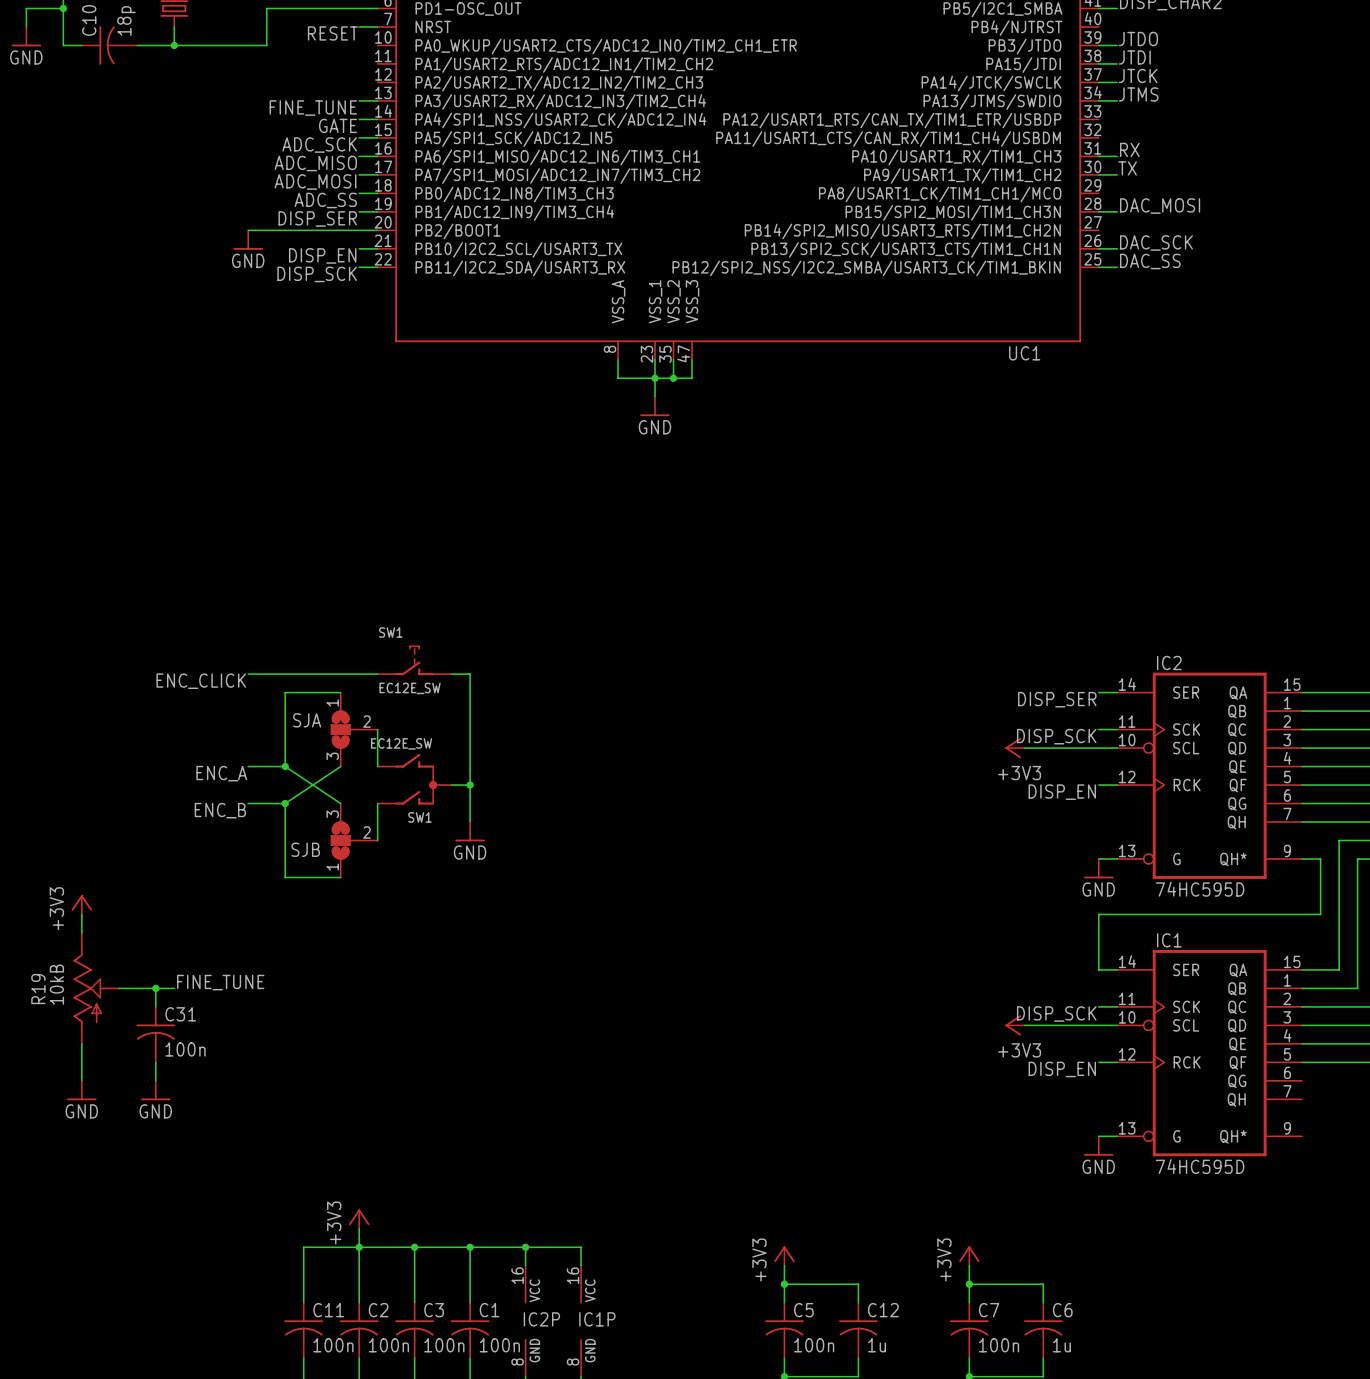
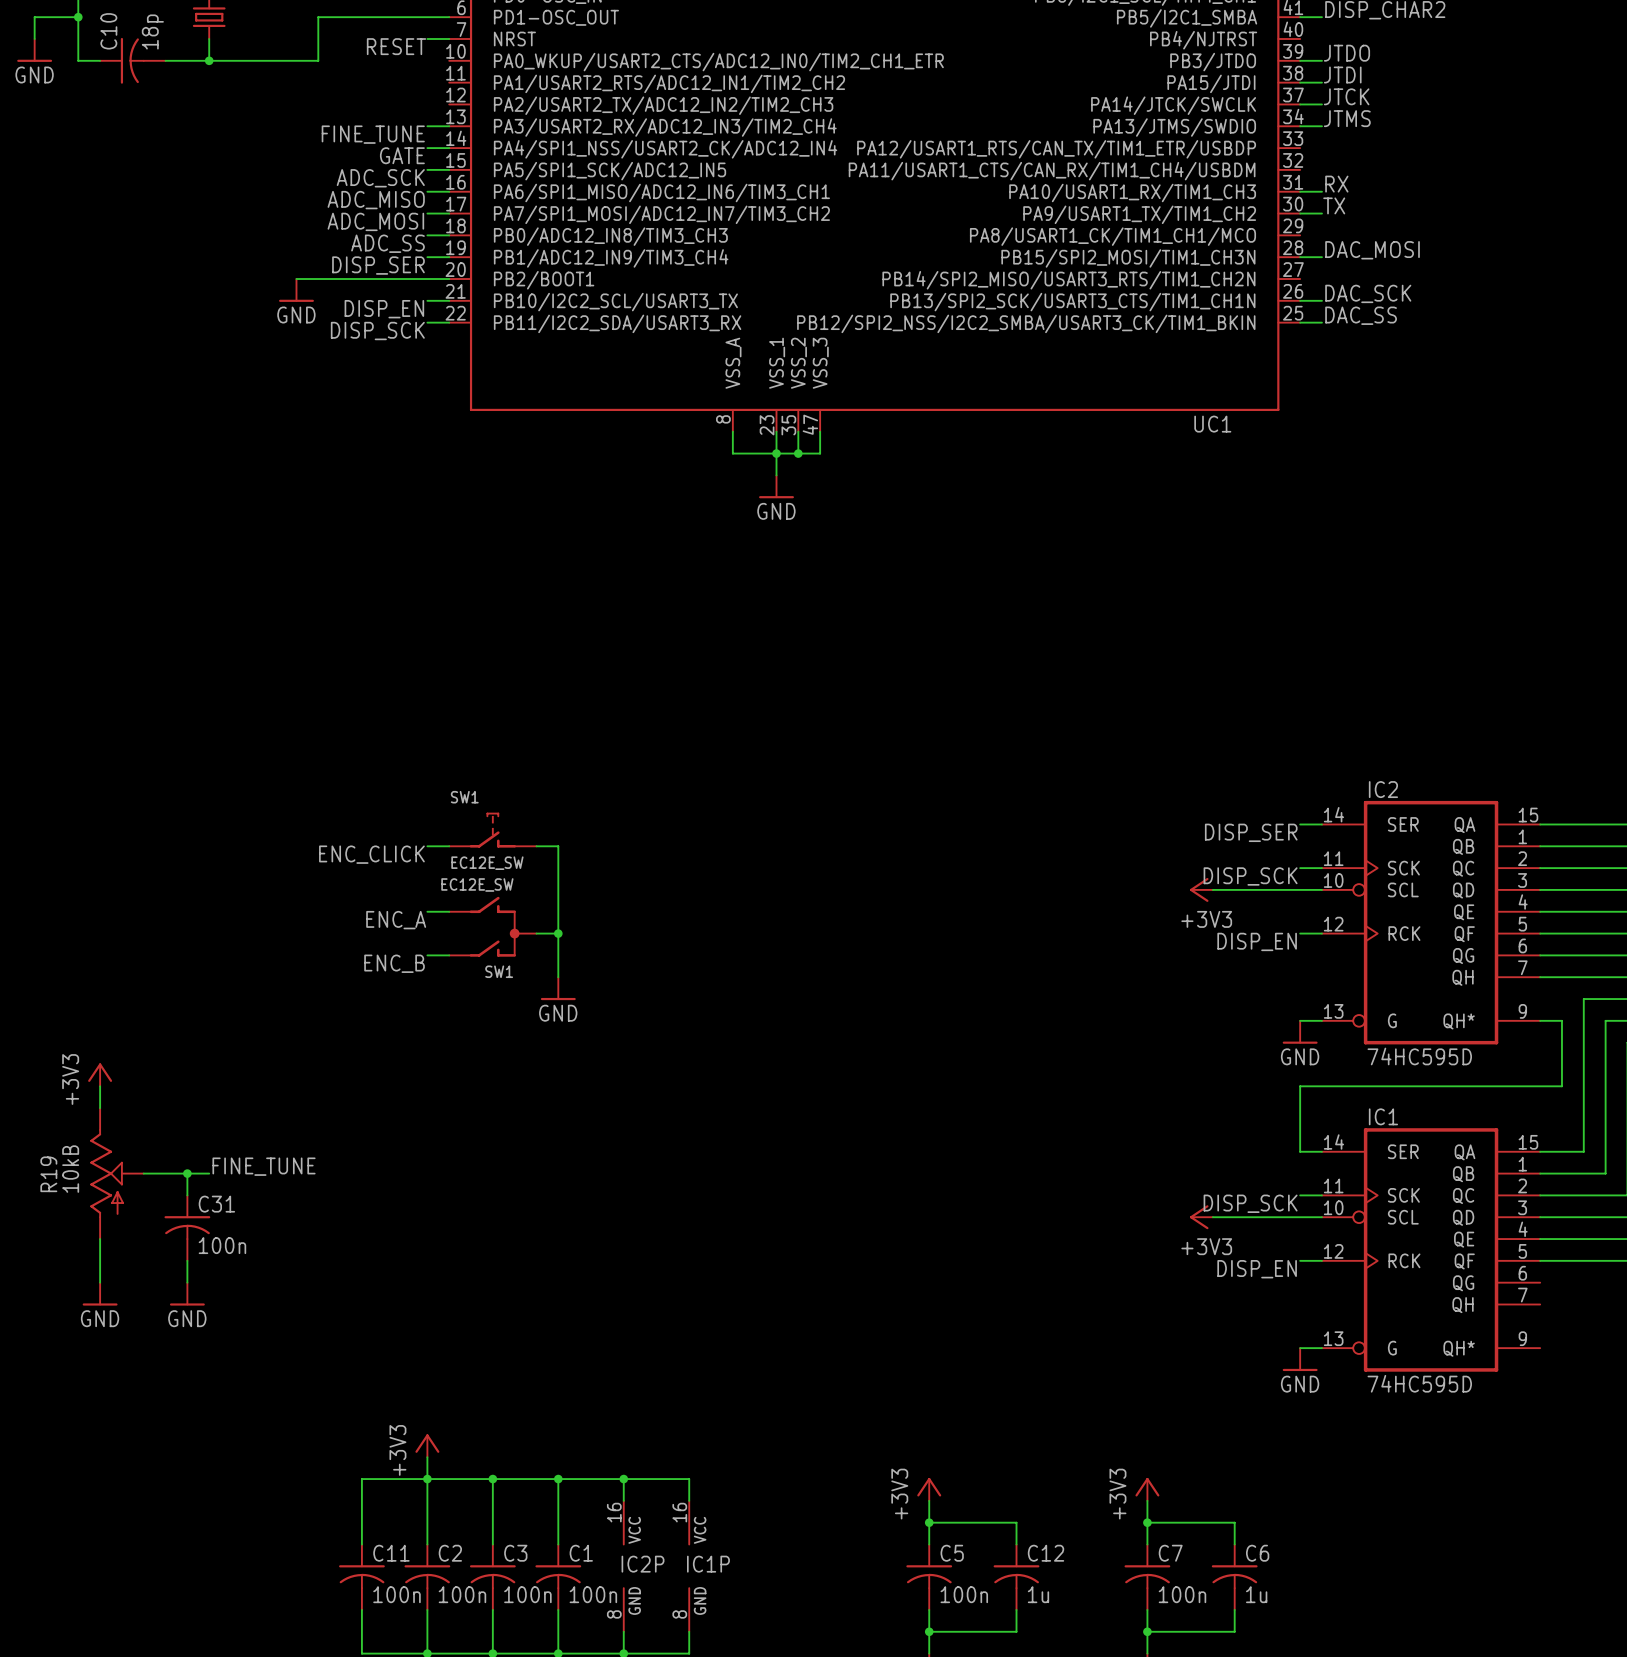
SW1 position: (414, 660) -> (492, 830)
wire: (248, 674) (377, 674) -> none
wire: (451, 674) (470, 674) (470, 711) -> (536, 846) (558, 846)
label position: ENC_CLICK (201, 681) -> ENC_CLICK (371, 854)
wire: (340, 692) (285, 692) (285, 766) -> none
wire: none -> (427, 846) (449, 846)
SJA: (354, 729) -> none
wire: (377, 729) (377, 766) -> (427, 911) (449, 911)
wire: (248, 766) (285, 766) -> none
wire: (285, 766) (340, 803) -> none
junction: (285, 766) -> none
wire: (340, 766) (285, 803) -> none
label position: ENC_A (221, 773) -> ENC_A (396, 920)
wire: (248, 803) (285, 803) -> none
wire: (285, 803) (285, 877) (340, 877) -> none
junction: (285, 803) -> none
wire: (377, 803) (377, 840) -> (449, 955) (427, 955)
label position: ENC_B (220, 810) -> ENC_B (394, 963)
SJB: (354, 840) -> none

